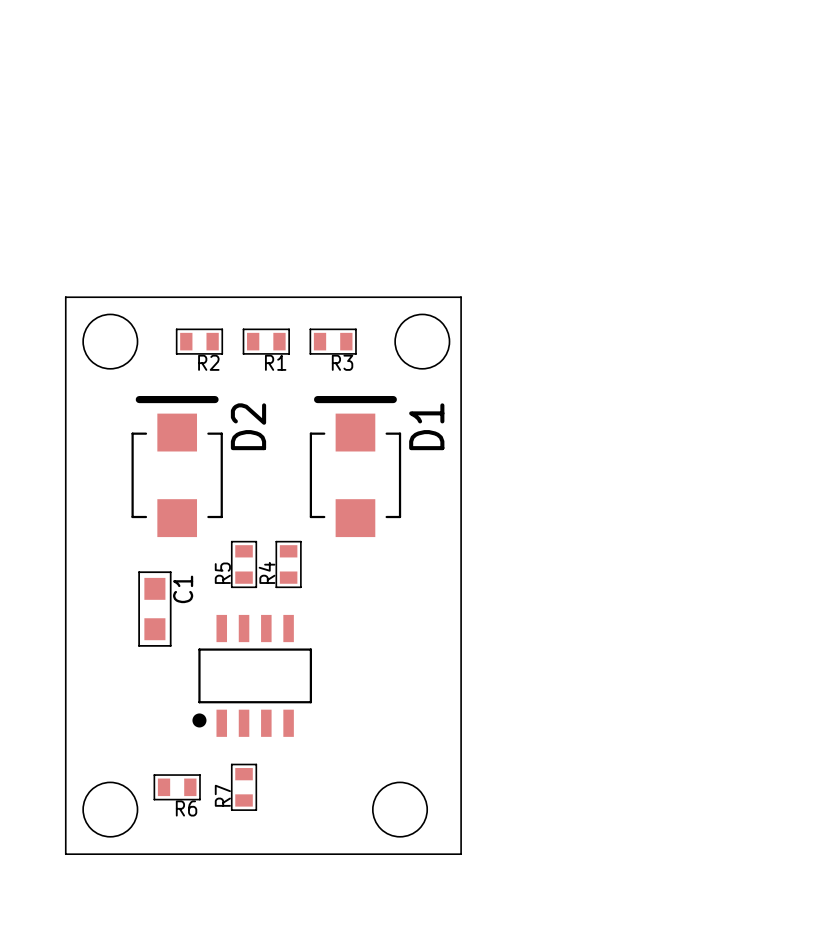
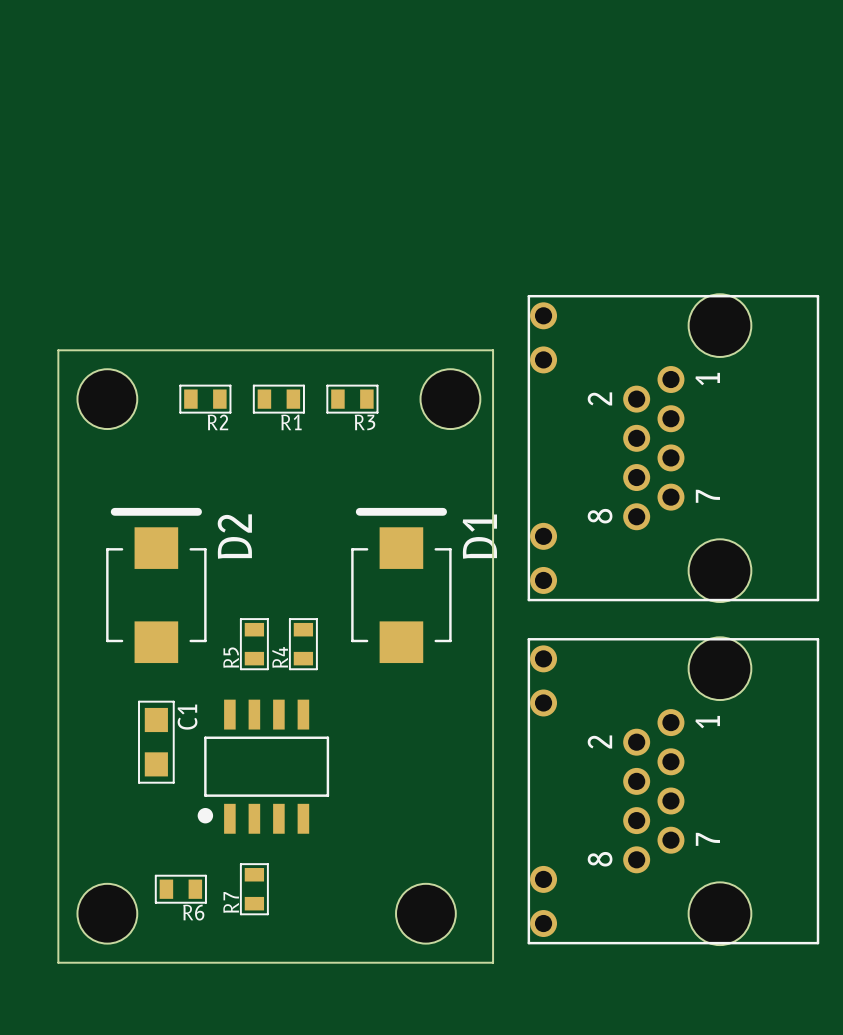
part: none -> (673, 448)
D2 position: (177, 466) -> (156, 585)
D1 position: (355, 466) -> (401, 585)
C1 position: (154, 609) -> (156, 742)
part: none -> (673, 791)

